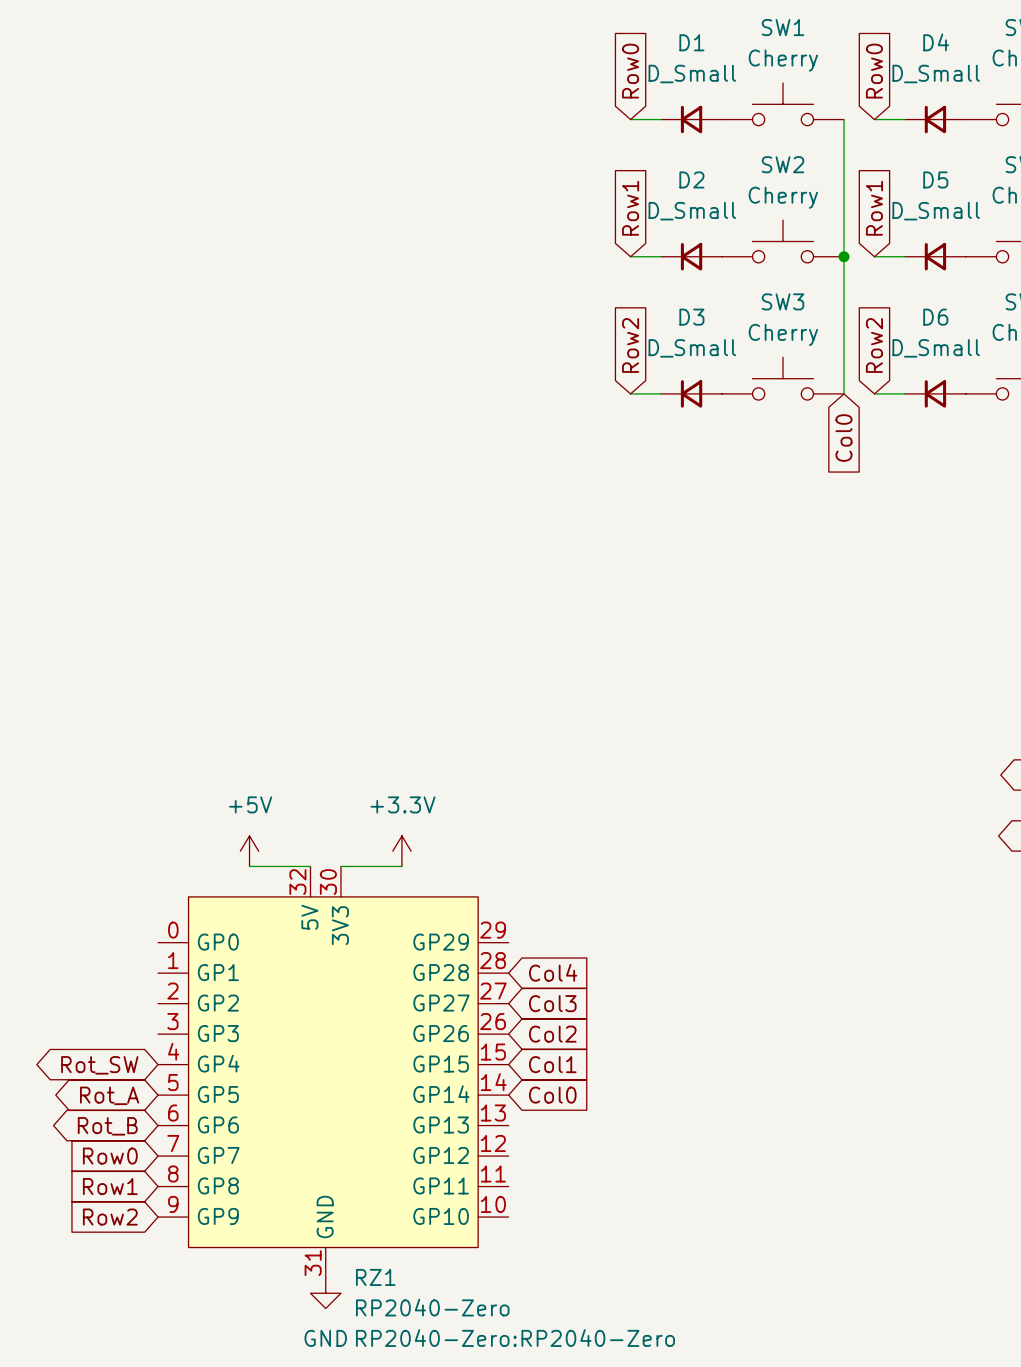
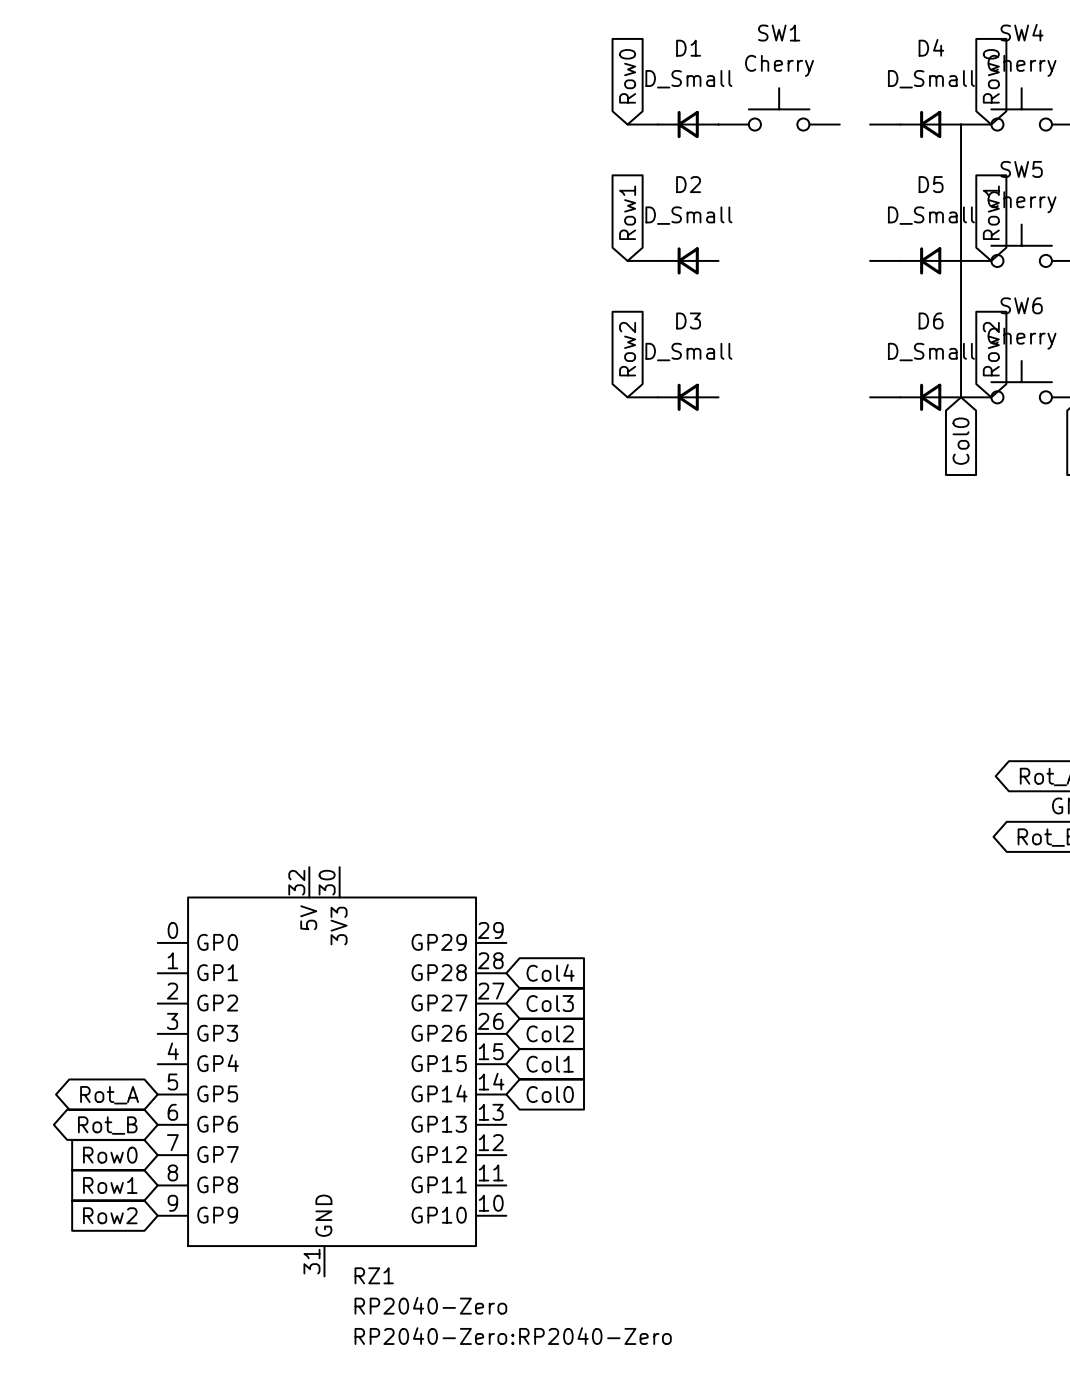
global label: Row0 (874, 71) -> none
global label: none -> Row0 (991, 76)
wire: (843, 119) (843, 393) -> (961, 124) (961, 397)
global label: Row1 (874, 208) -> none
global label: none -> Row1 (991, 212)
SW2: Cherry (783, 241) -> none
junction: (843, 256) -> none
global label: Row2 (874, 345) -> none
global label: none -> Row2 (991, 349)
SW3: Cherry (783, 378) -> none
global label position: Col0 (843, 438) -> Col0 (961, 441)
power symbol: +5V (249, 851) -> none
power symbol: +3.3V (401, 851) -> none
wire: (249, 866) (310, 866) -> none
wire: (340, 866) (401, 866) -> none
global label: Rot_SW (99, 1065) -> none
power symbol: GND (325, 1293) -> none

